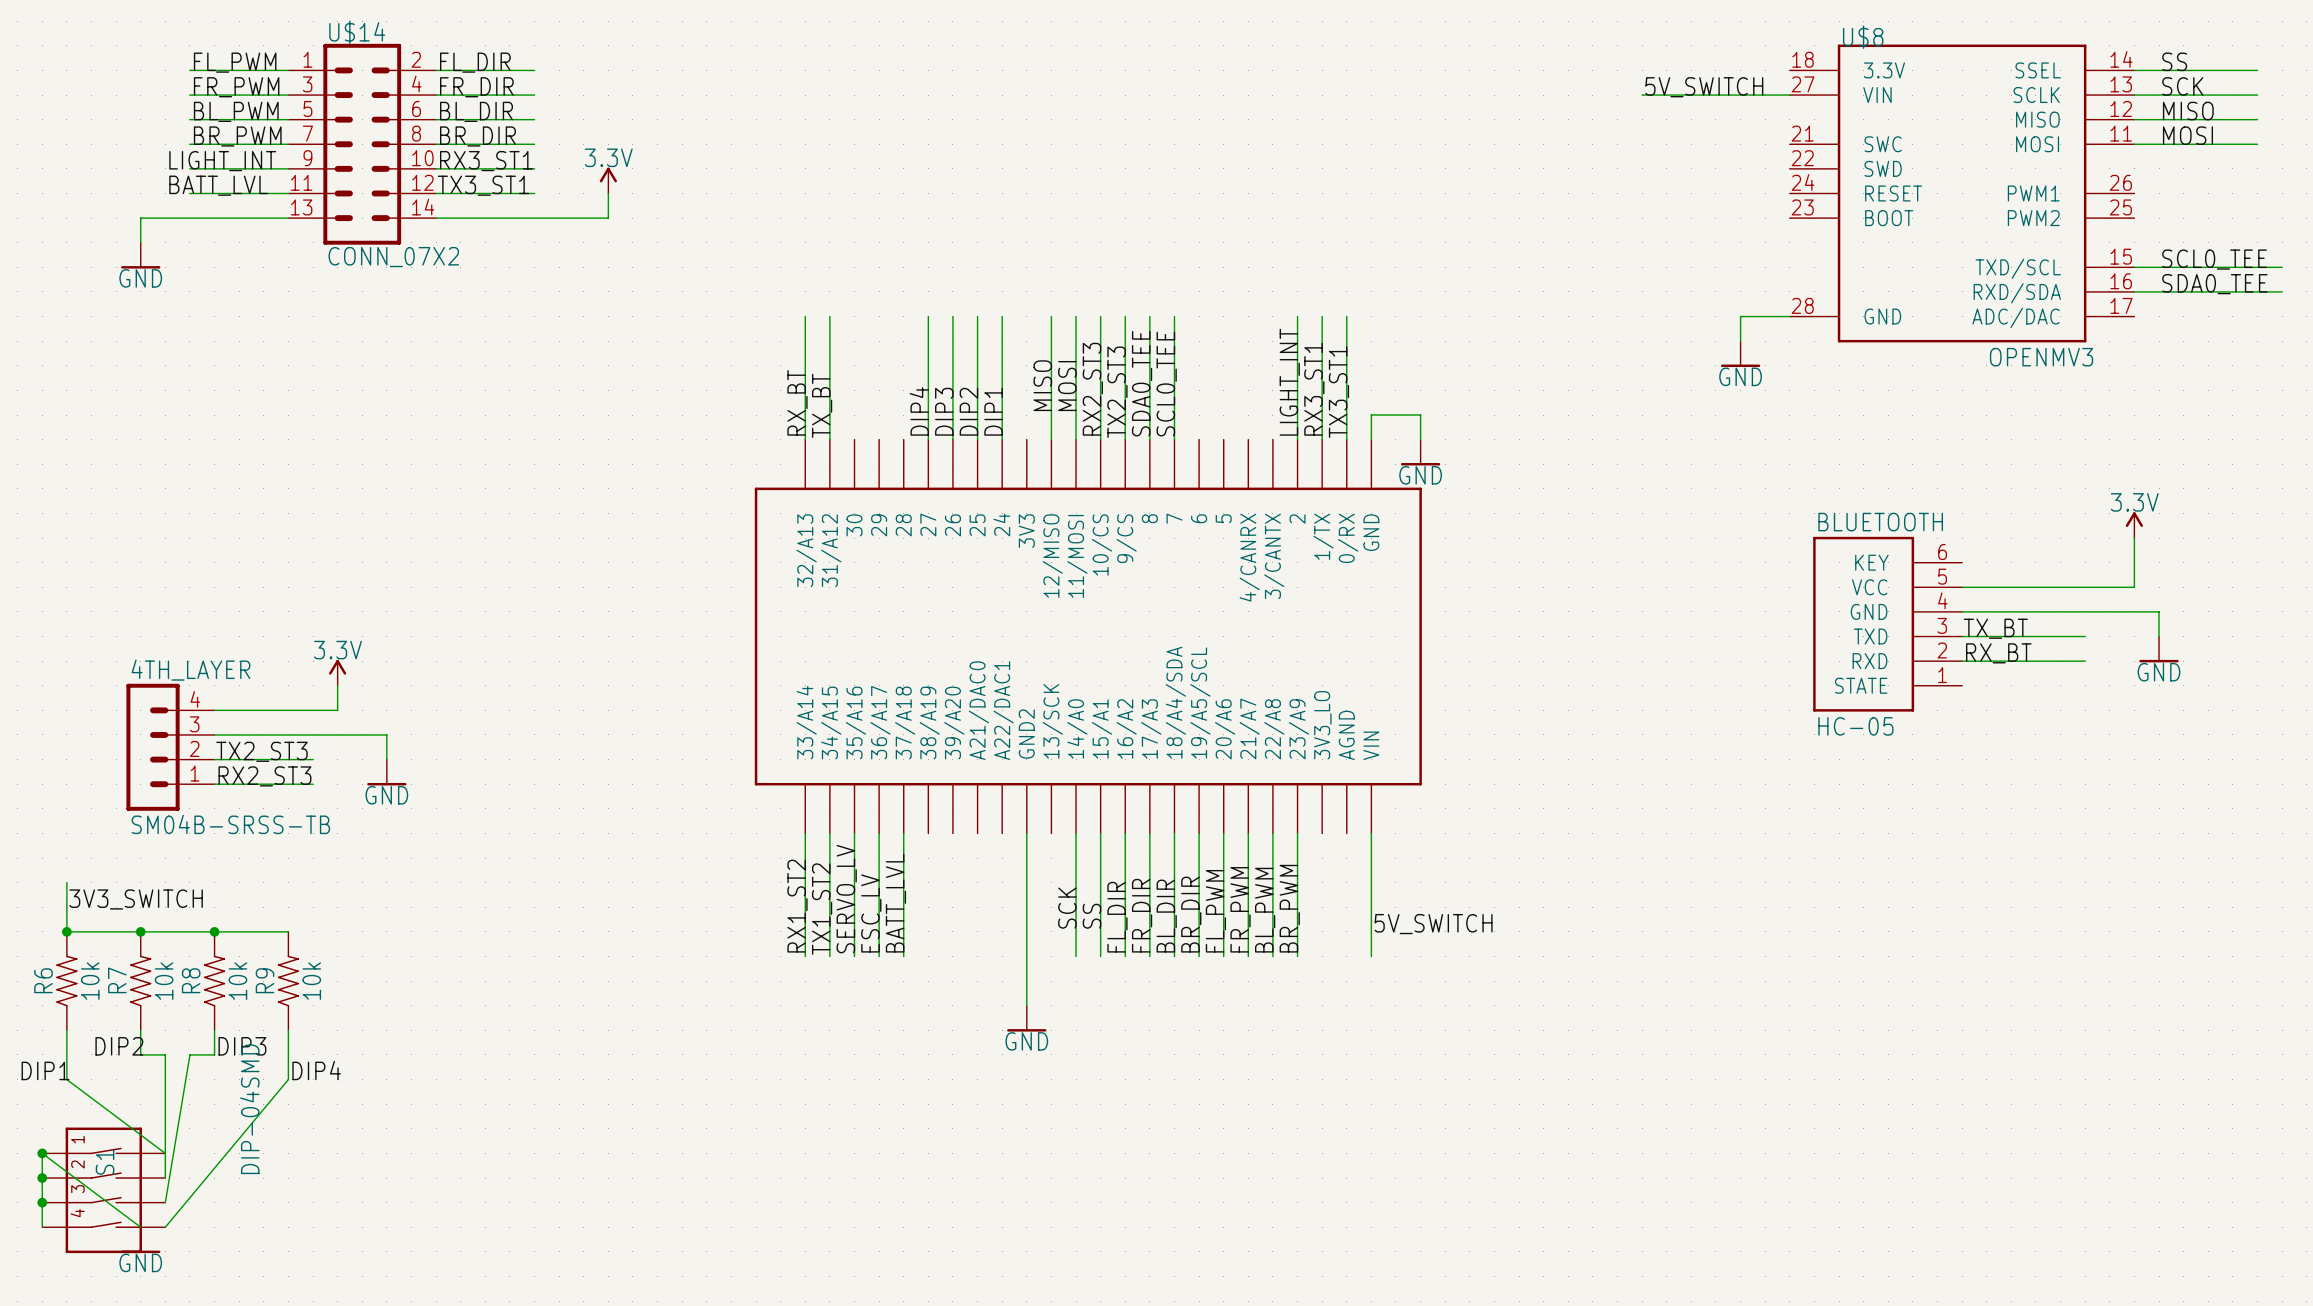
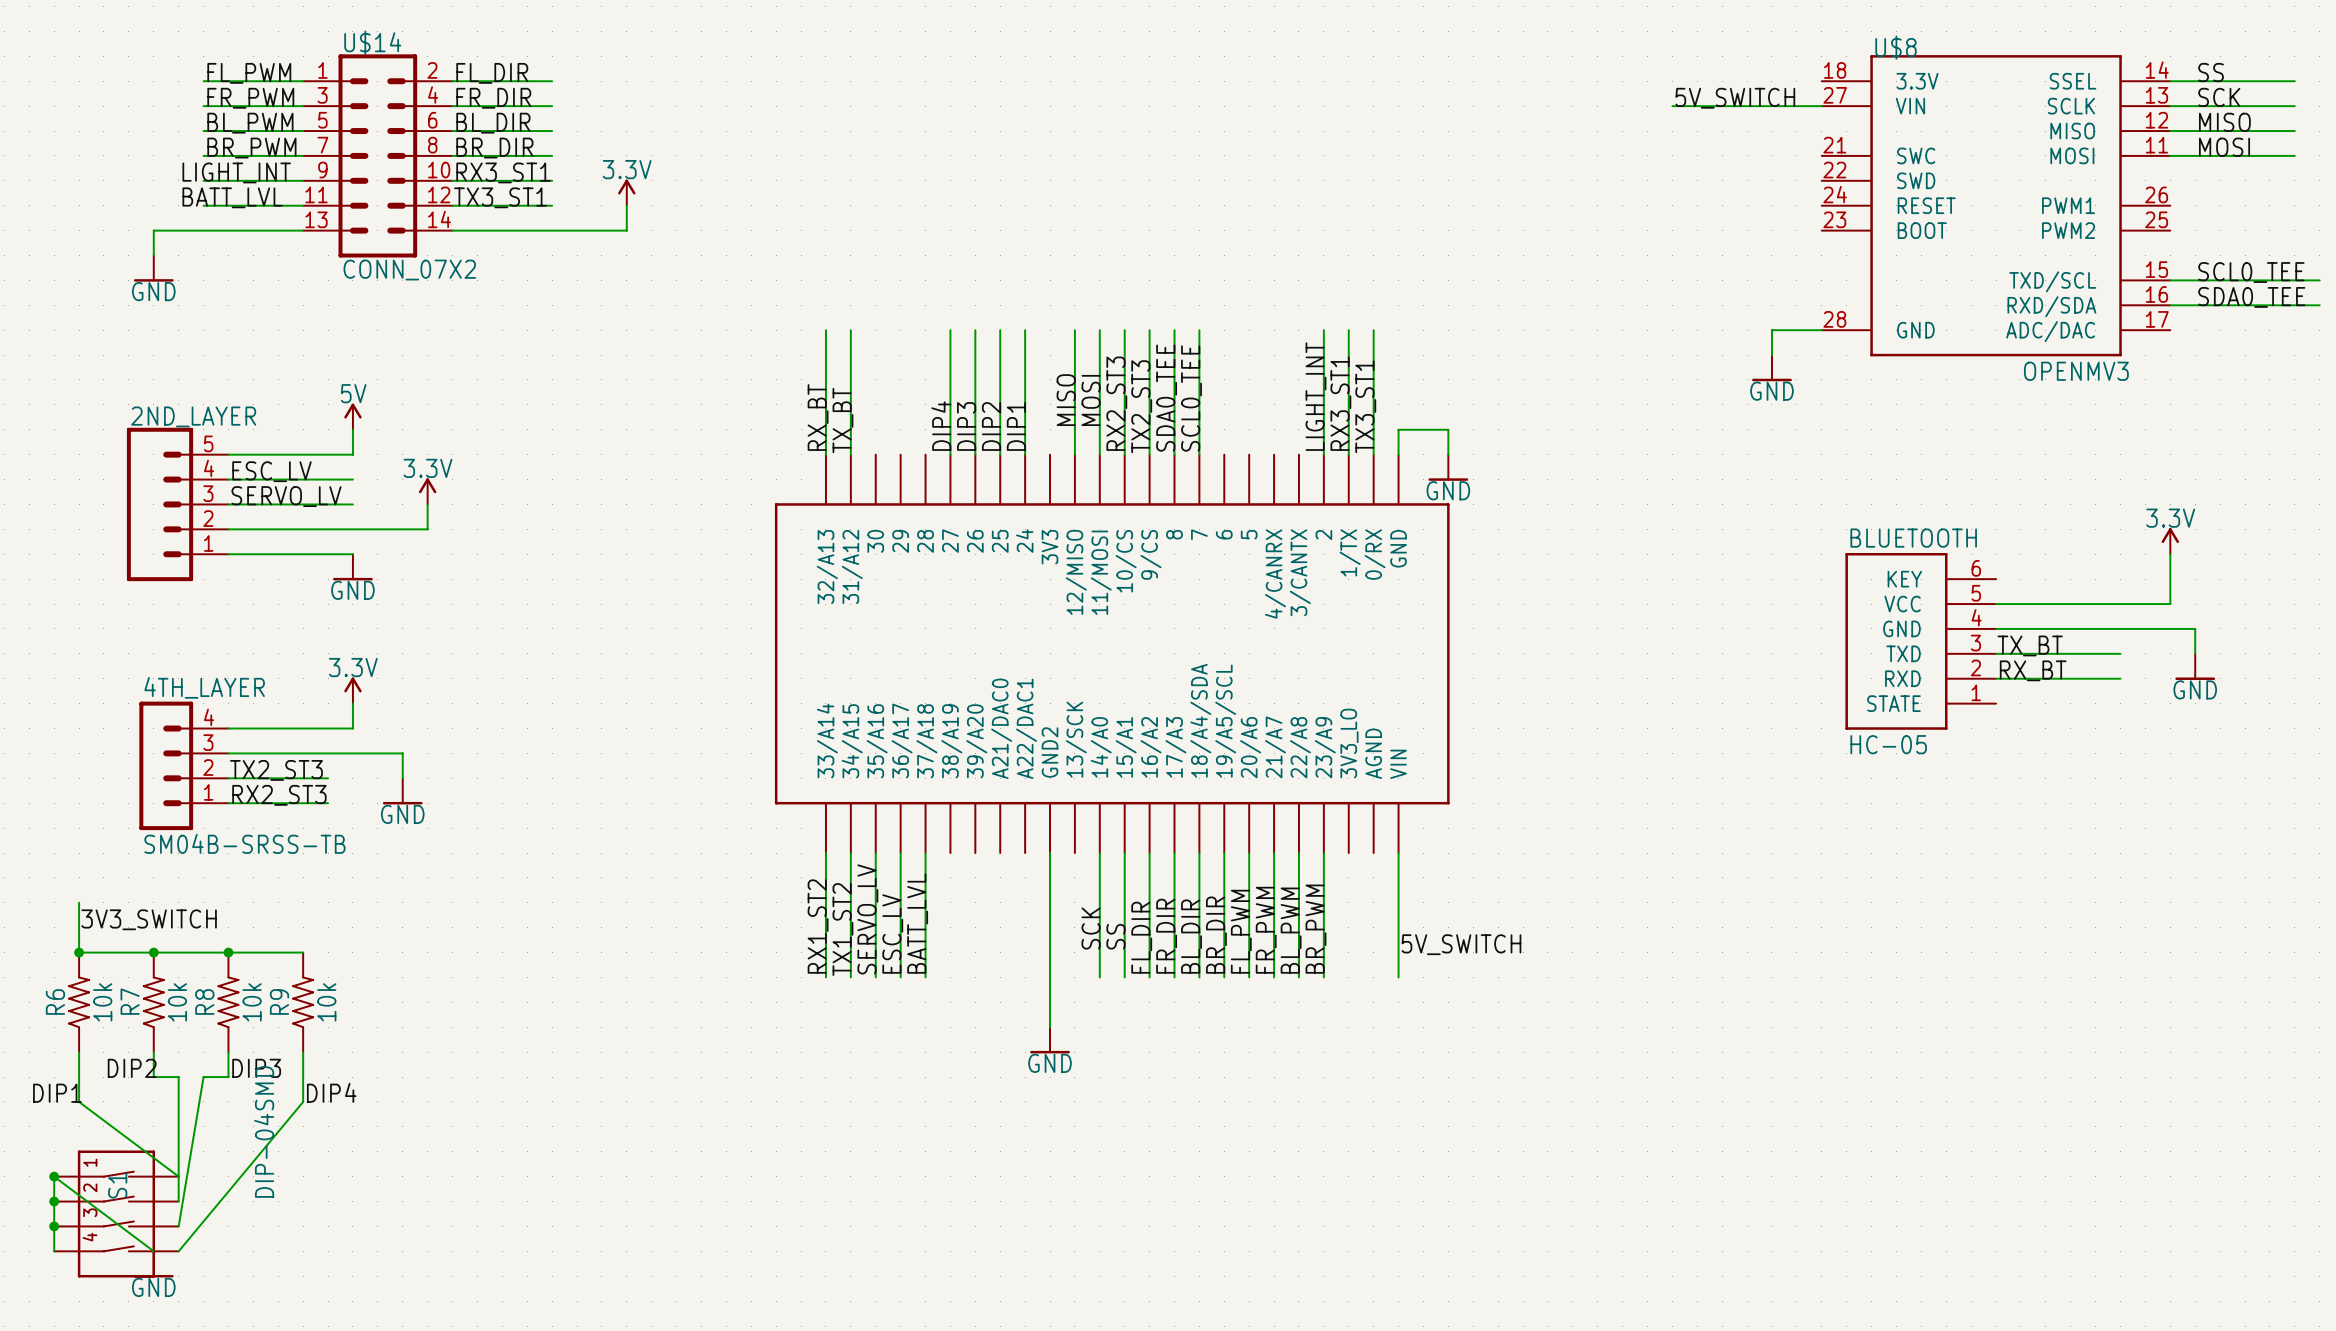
power symbol: none -> 5V (352, 416)
wire: none -> (352, 429) (352, 454) (228, 454)
label: none -> ESC_LV (271, 471)
wire: none -> (228, 479) (352, 479)
power symbol: none -> 3.3V (427, 491)
label: none -> SERVO_LV (286, 496)
2ND_LAYER: none -> (177, 504)
wire: none -> (228, 504) (352, 504)
wire: none -> (427, 504) (427, 529) (228, 529)
wire: none -> (228, 554) (352, 554)
power symbol: none -> GND (352, 567)

